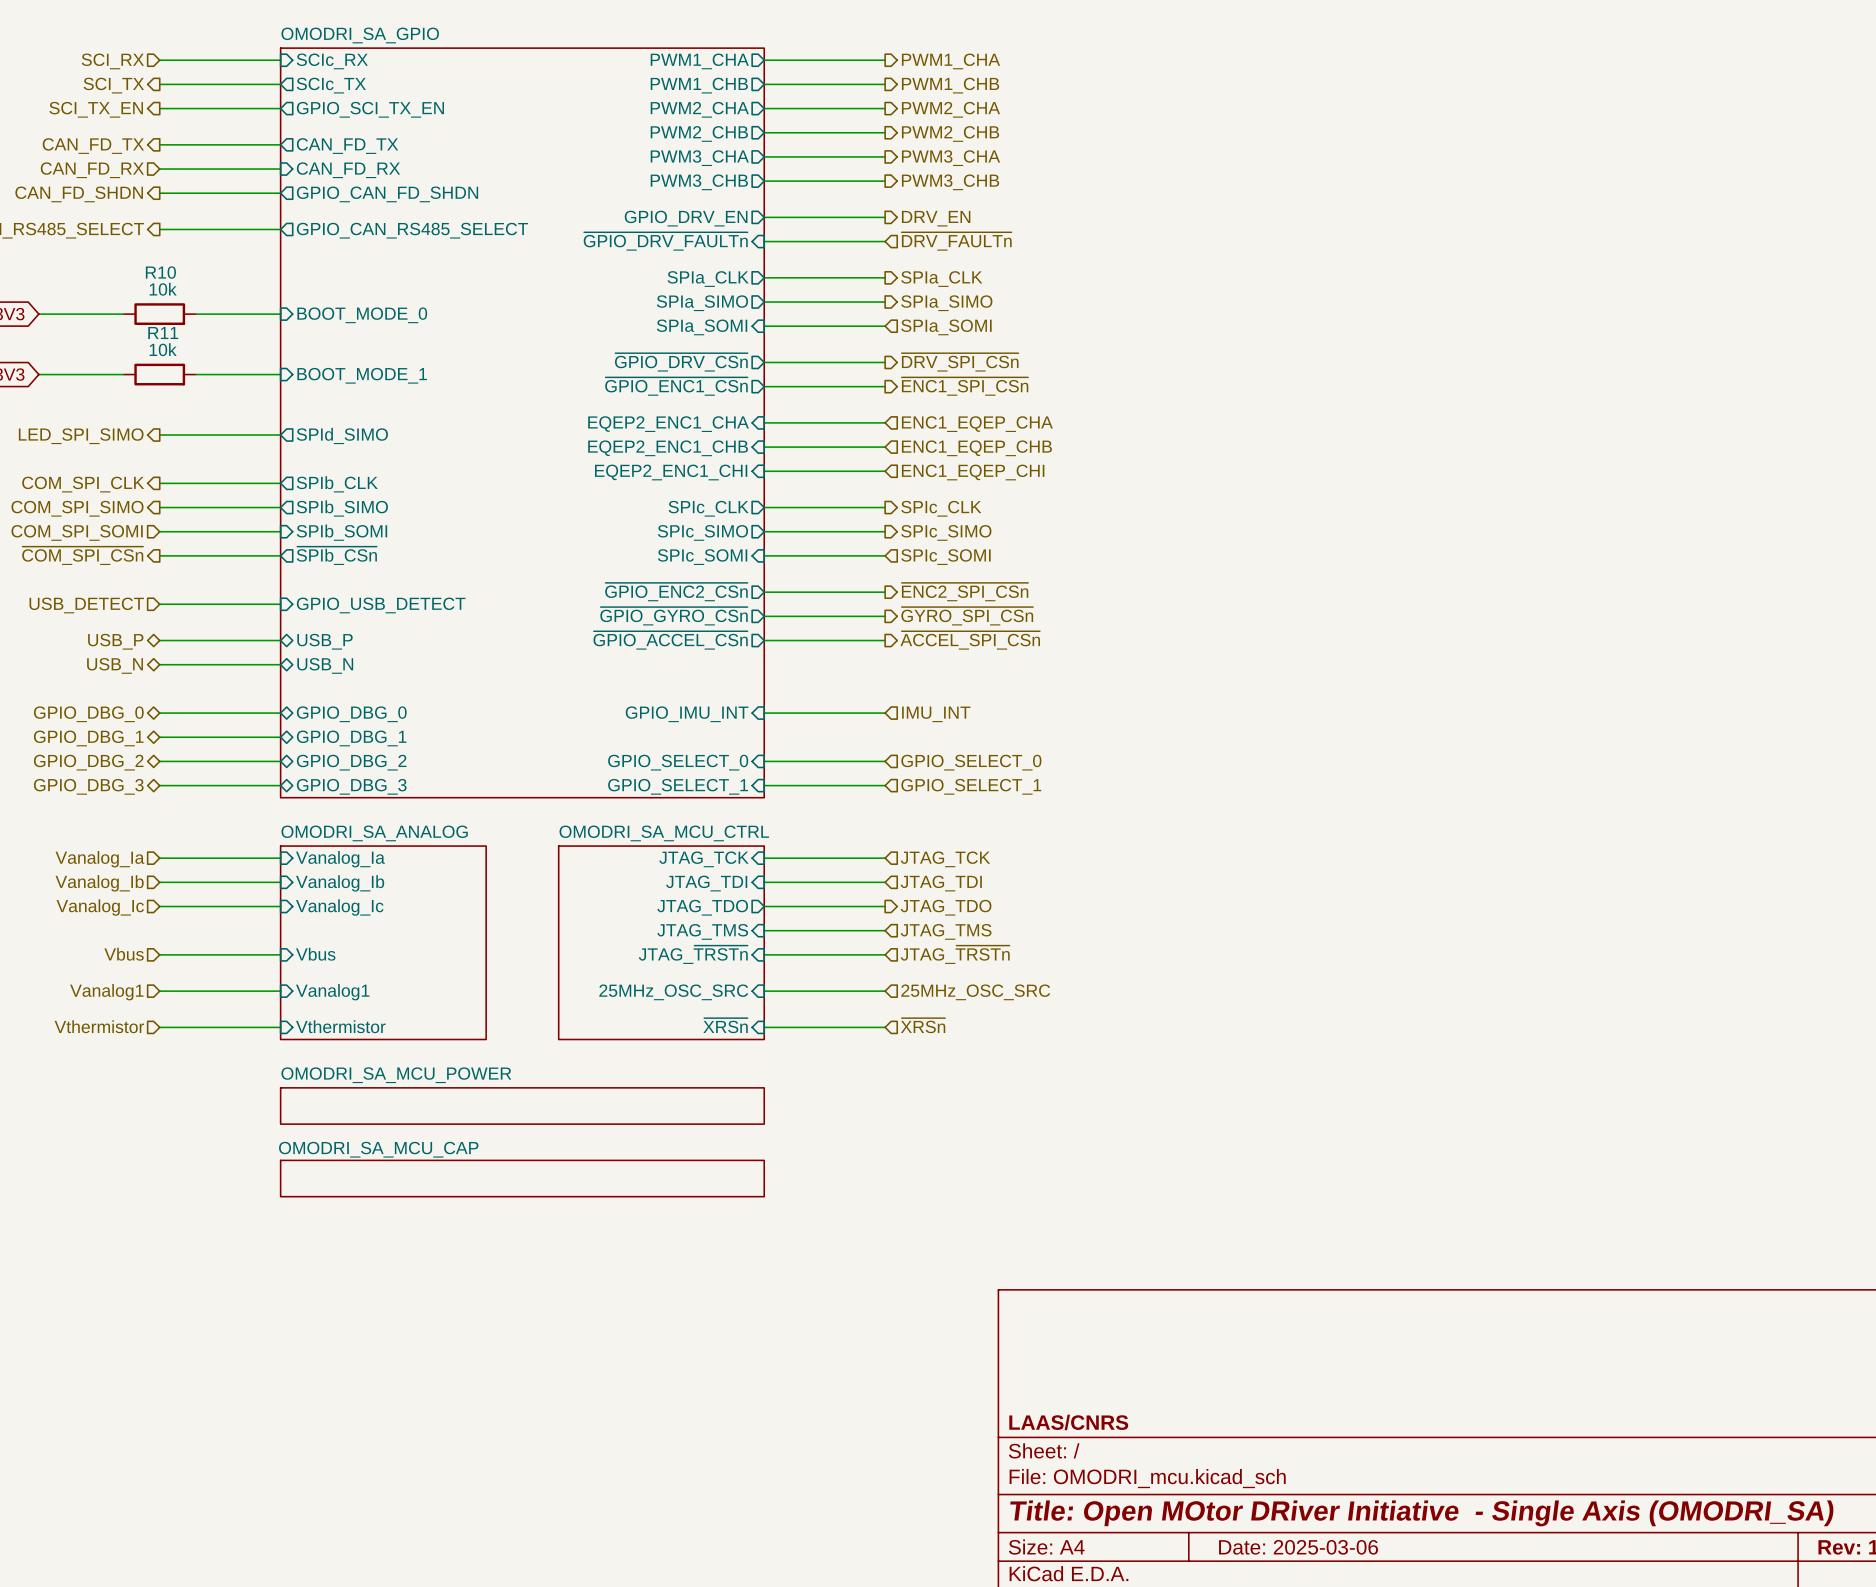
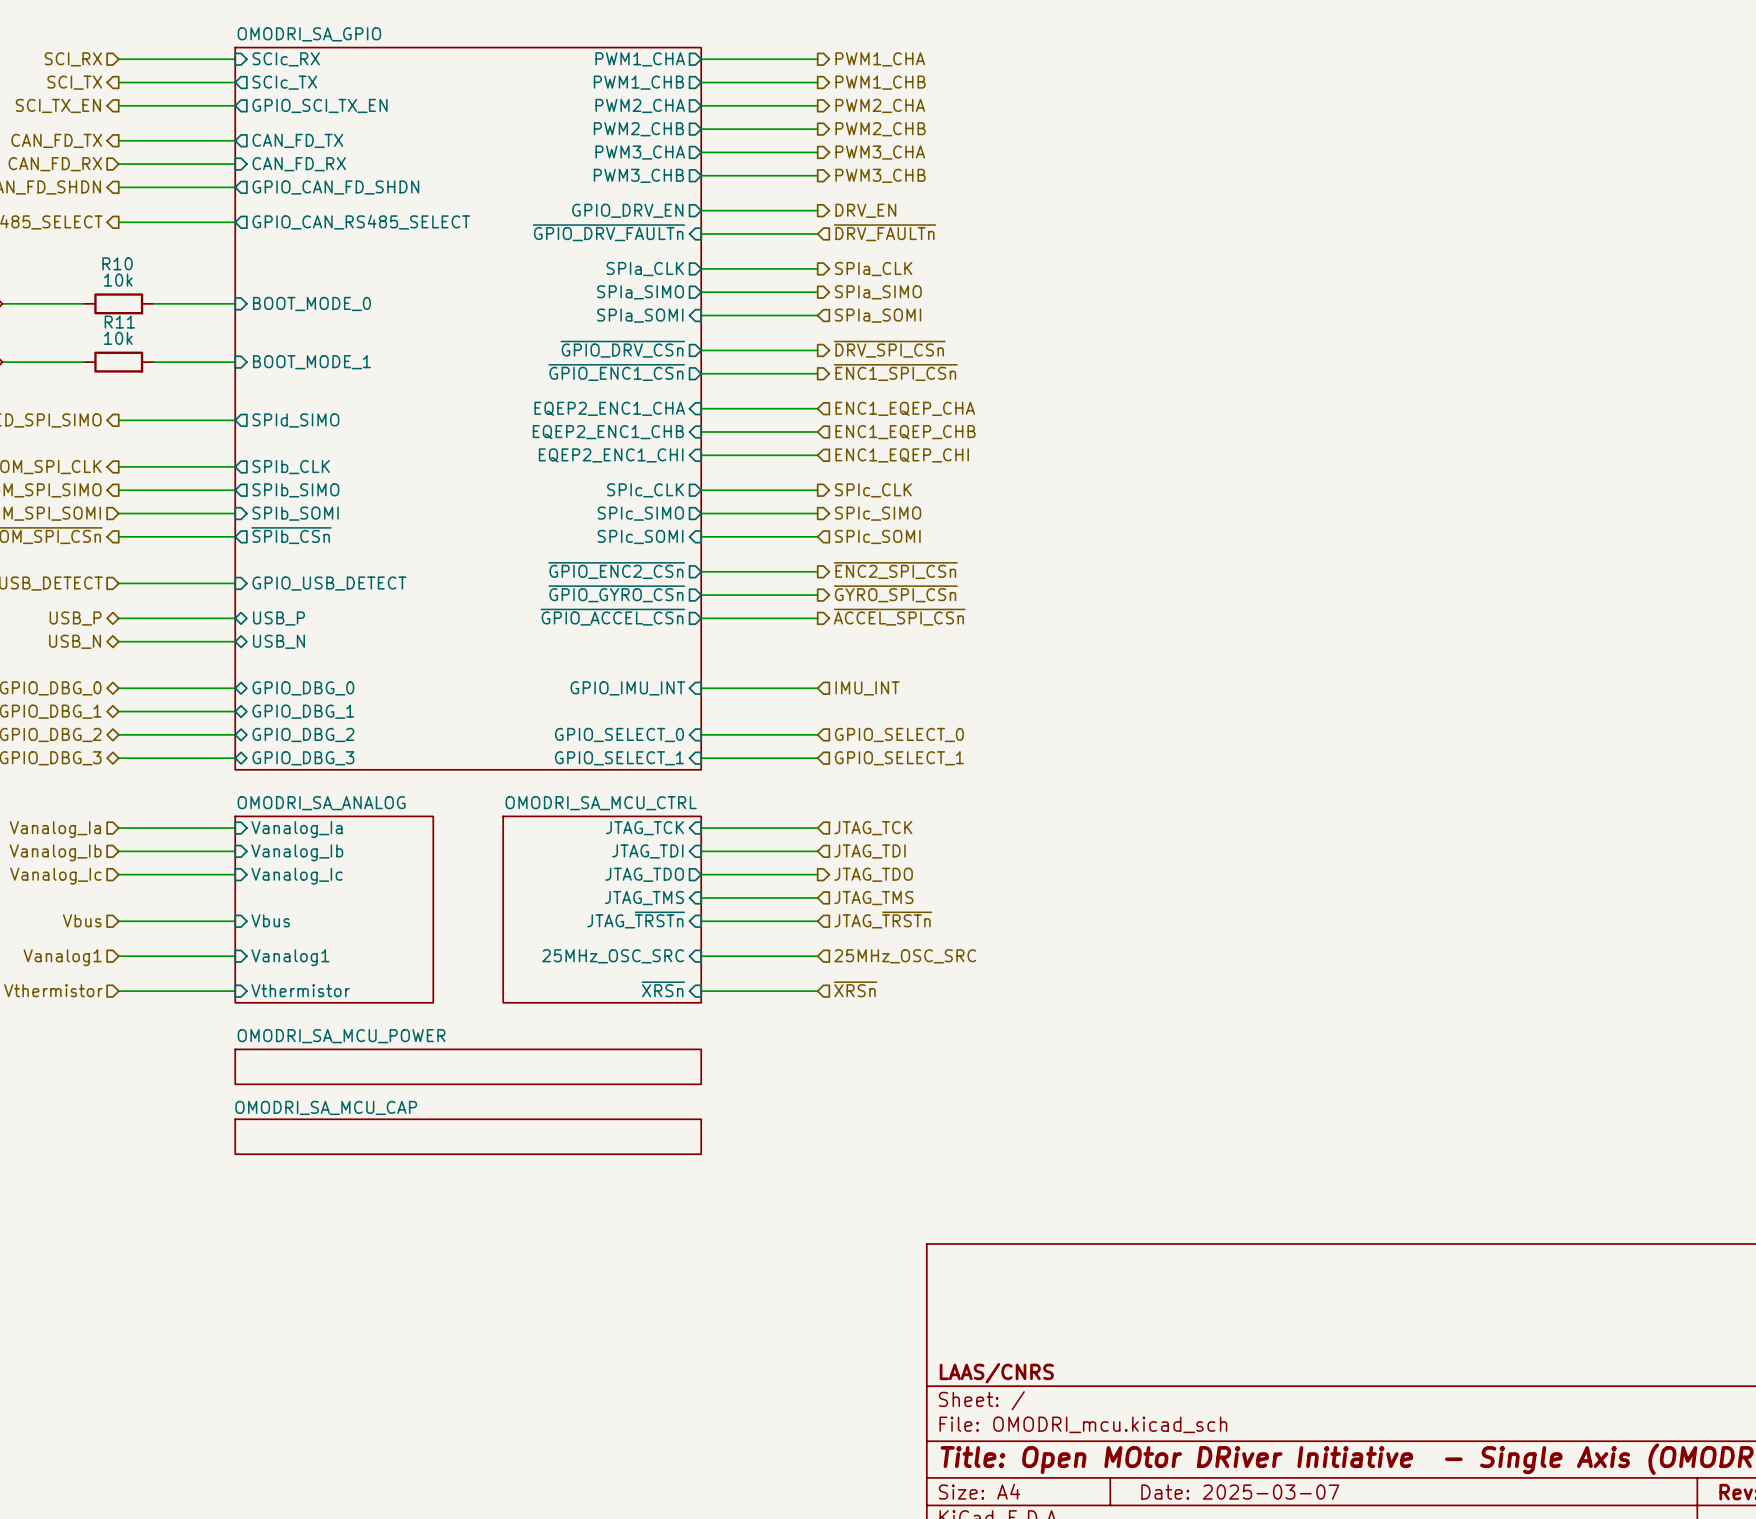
title block: Date: 2025-03-06 (1298, 1547) -> Date: 2025-03-07 (1240, 1492)

